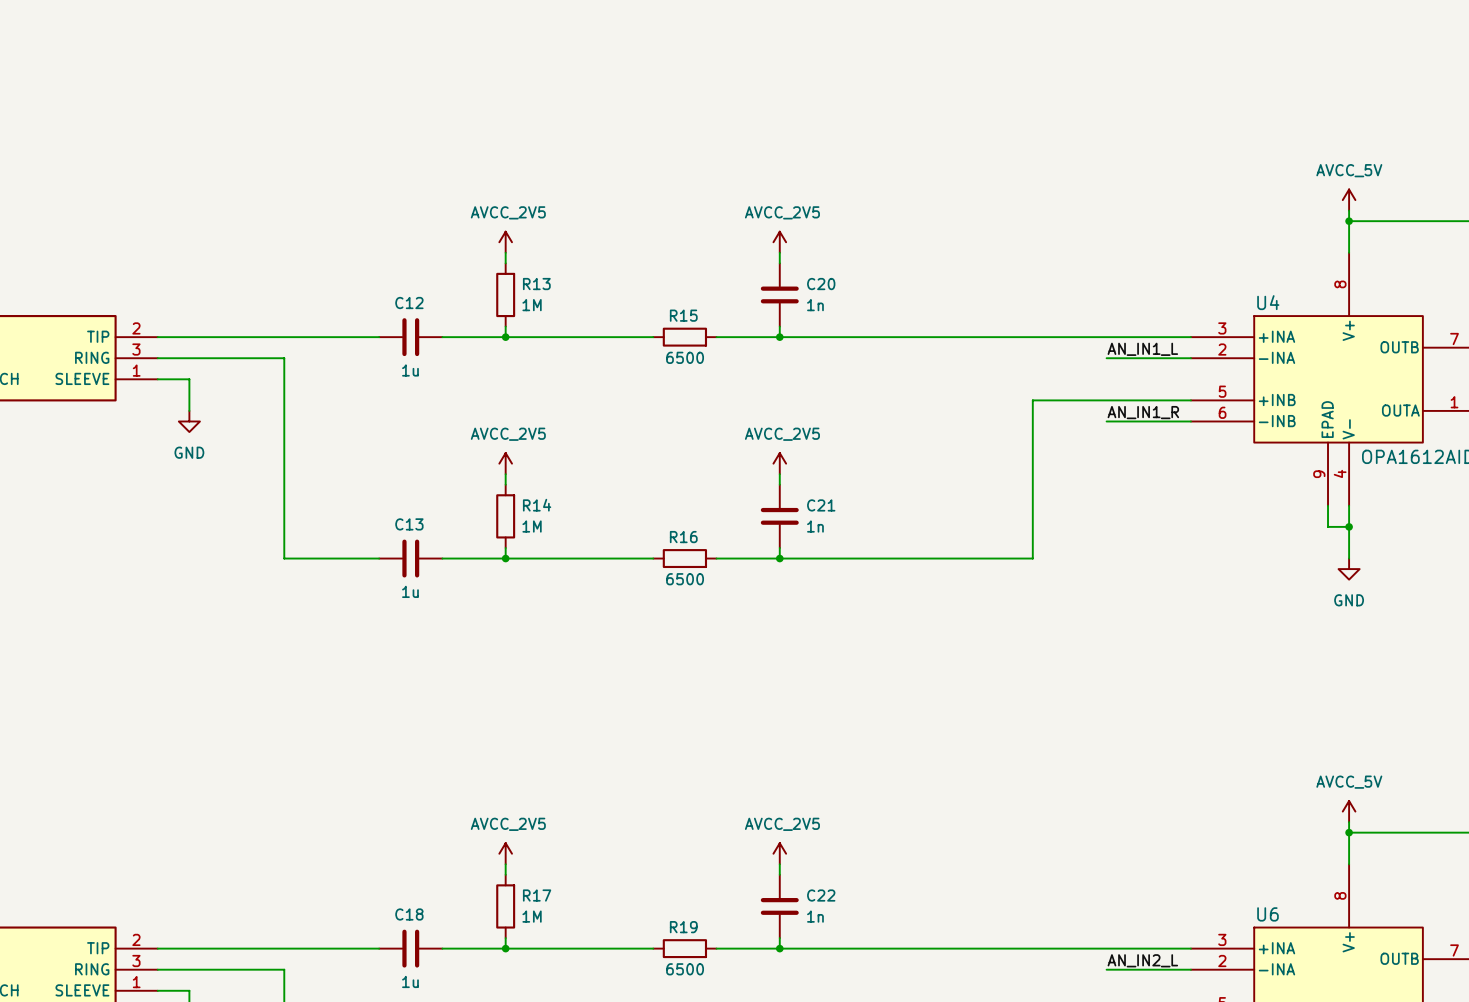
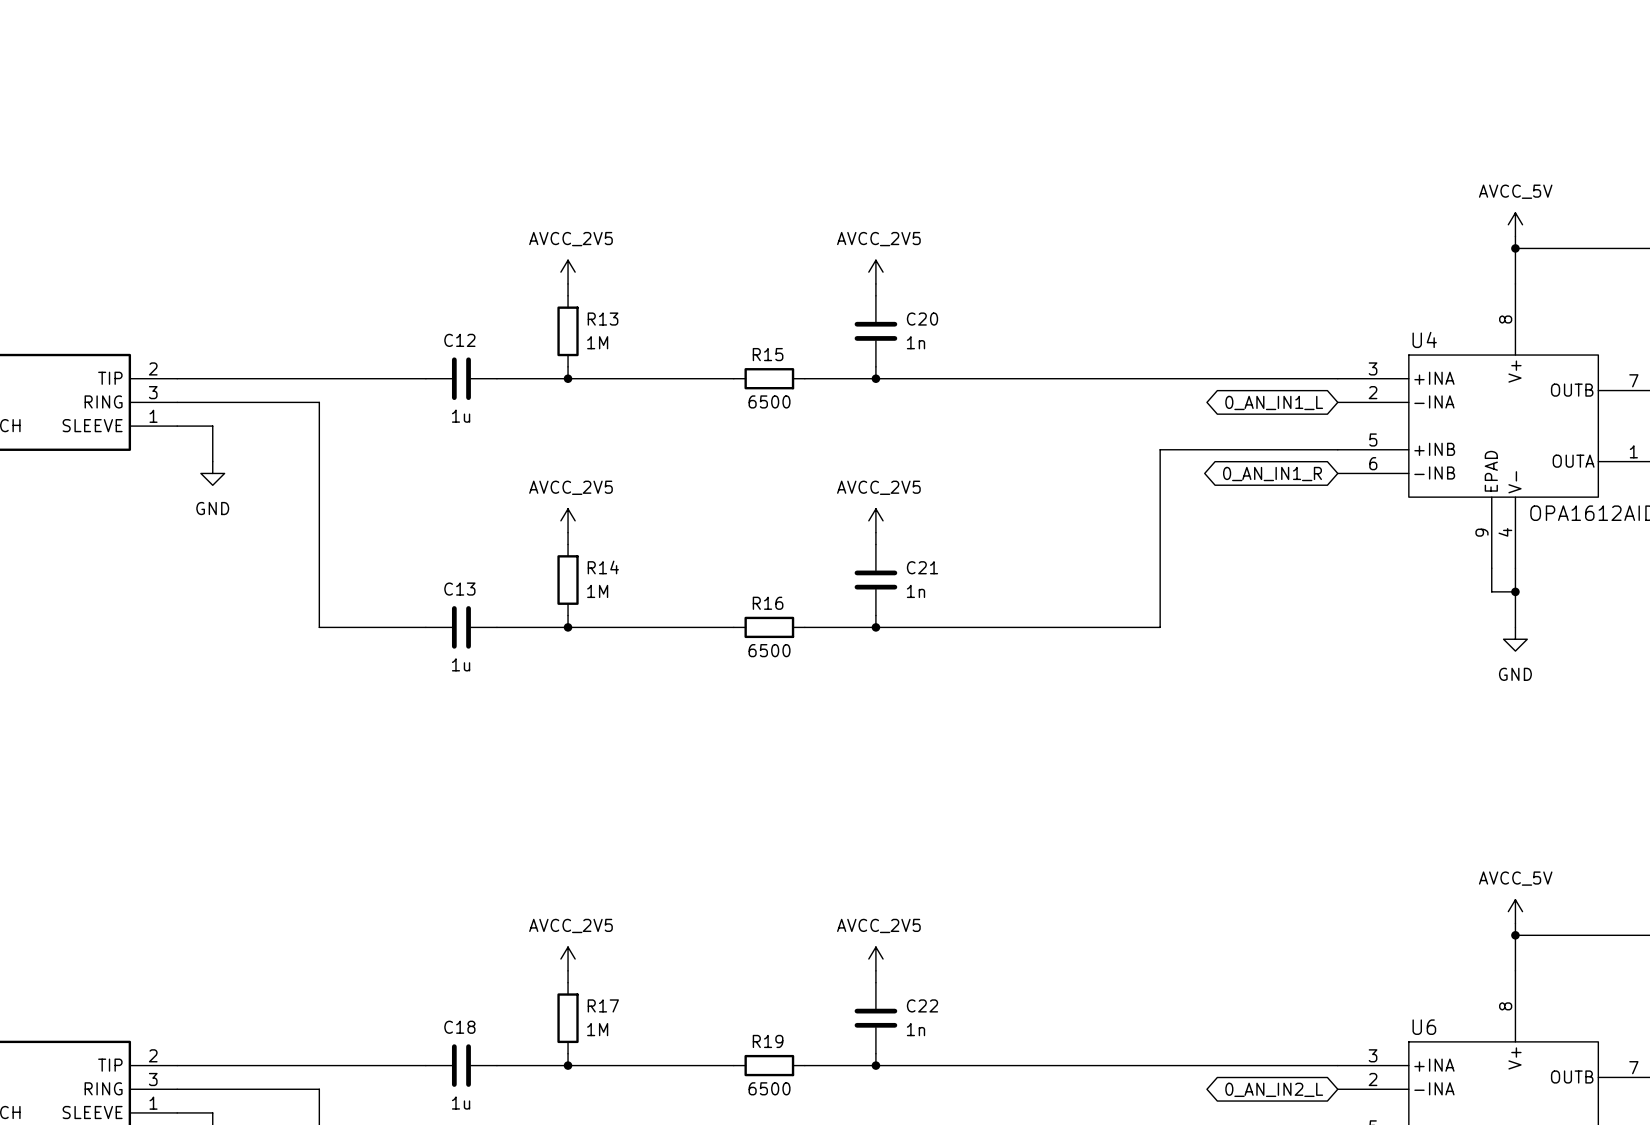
label: AN_IN1_L (1142, 349) -> none
wire: (1106, 358) (1190, 358) -> none
global label: none -> 0_AN_IN1_L (1274, 402)
label: AN_IN1_R (1143, 412) -> none
wire: (1106, 421) (1190, 421) -> none
global label: none -> 0_AN_IN1_R (1272, 474)
label: AN_IN2_L (1142, 960) -> none
wire: (1106, 969) (1190, 969) -> none
global label: none -> 0_AN_IN2_L (1274, 1089)

